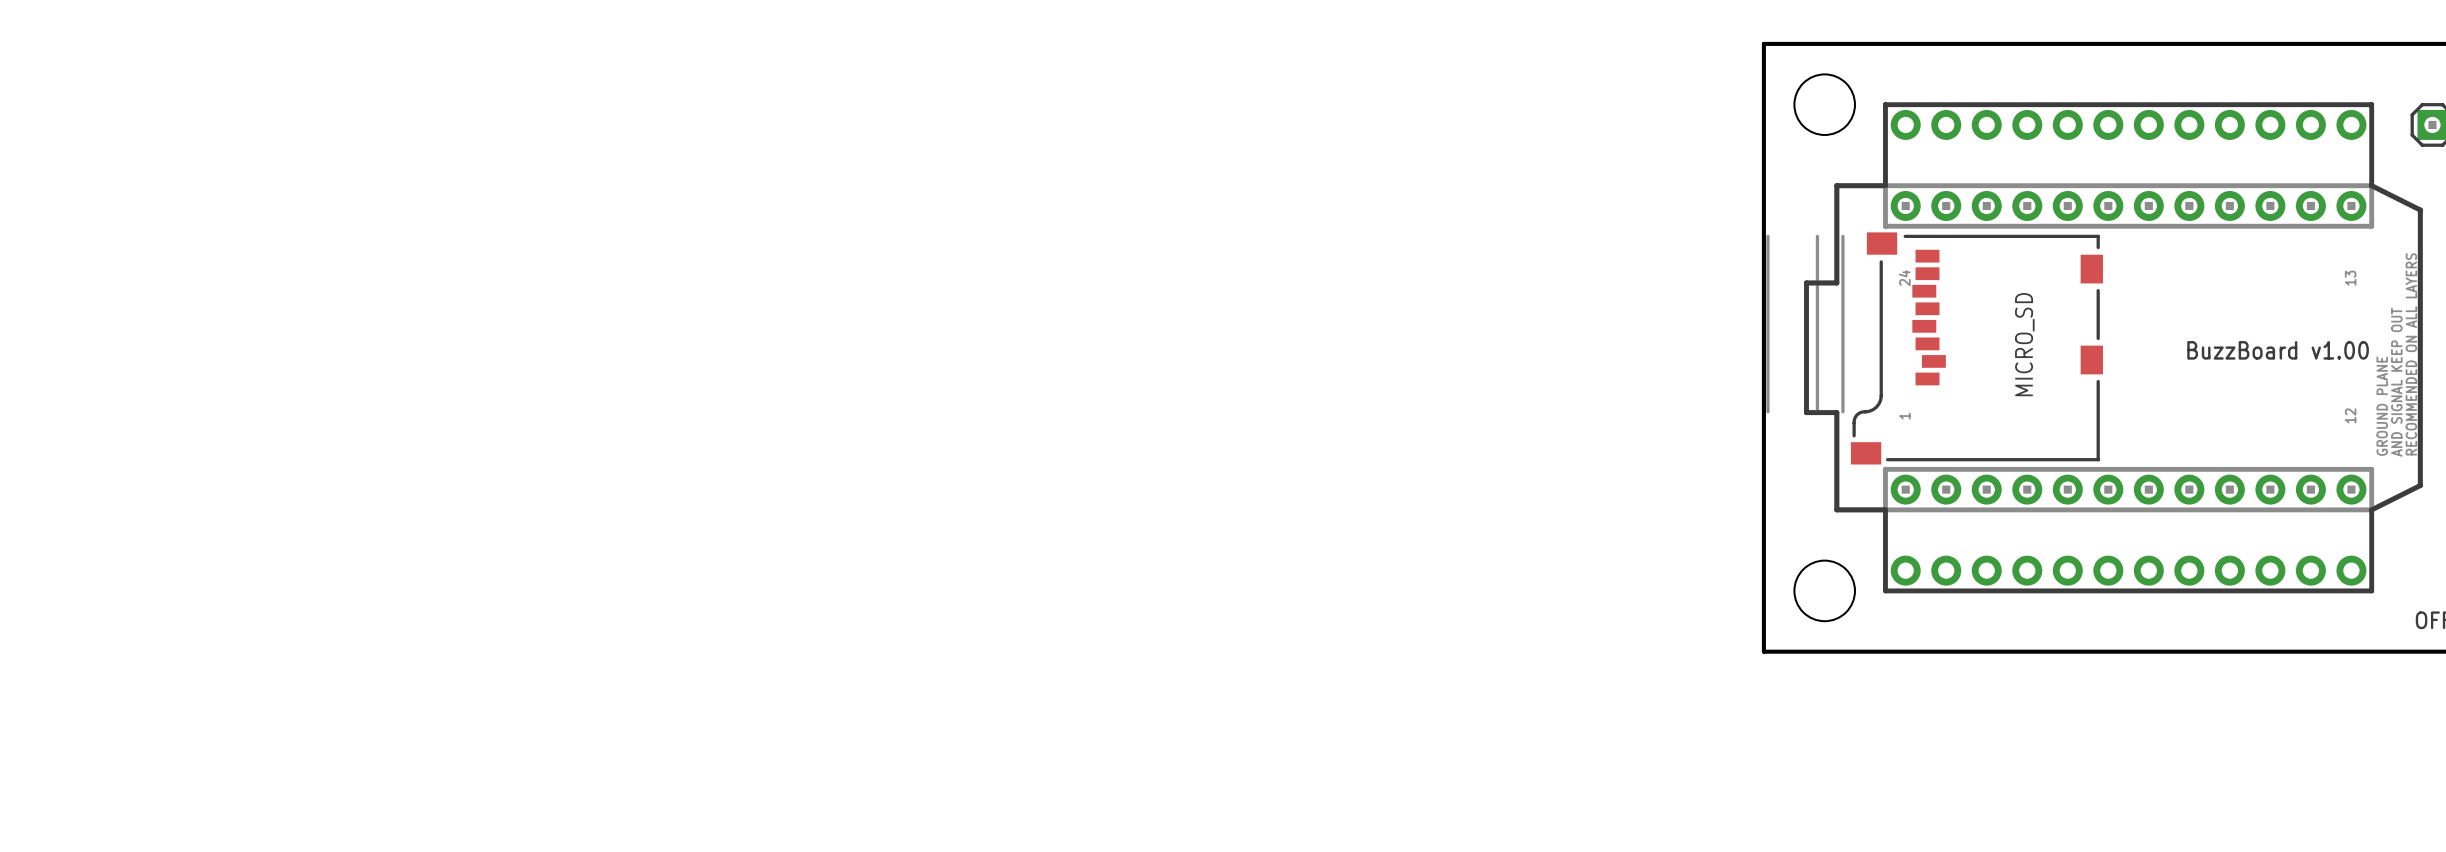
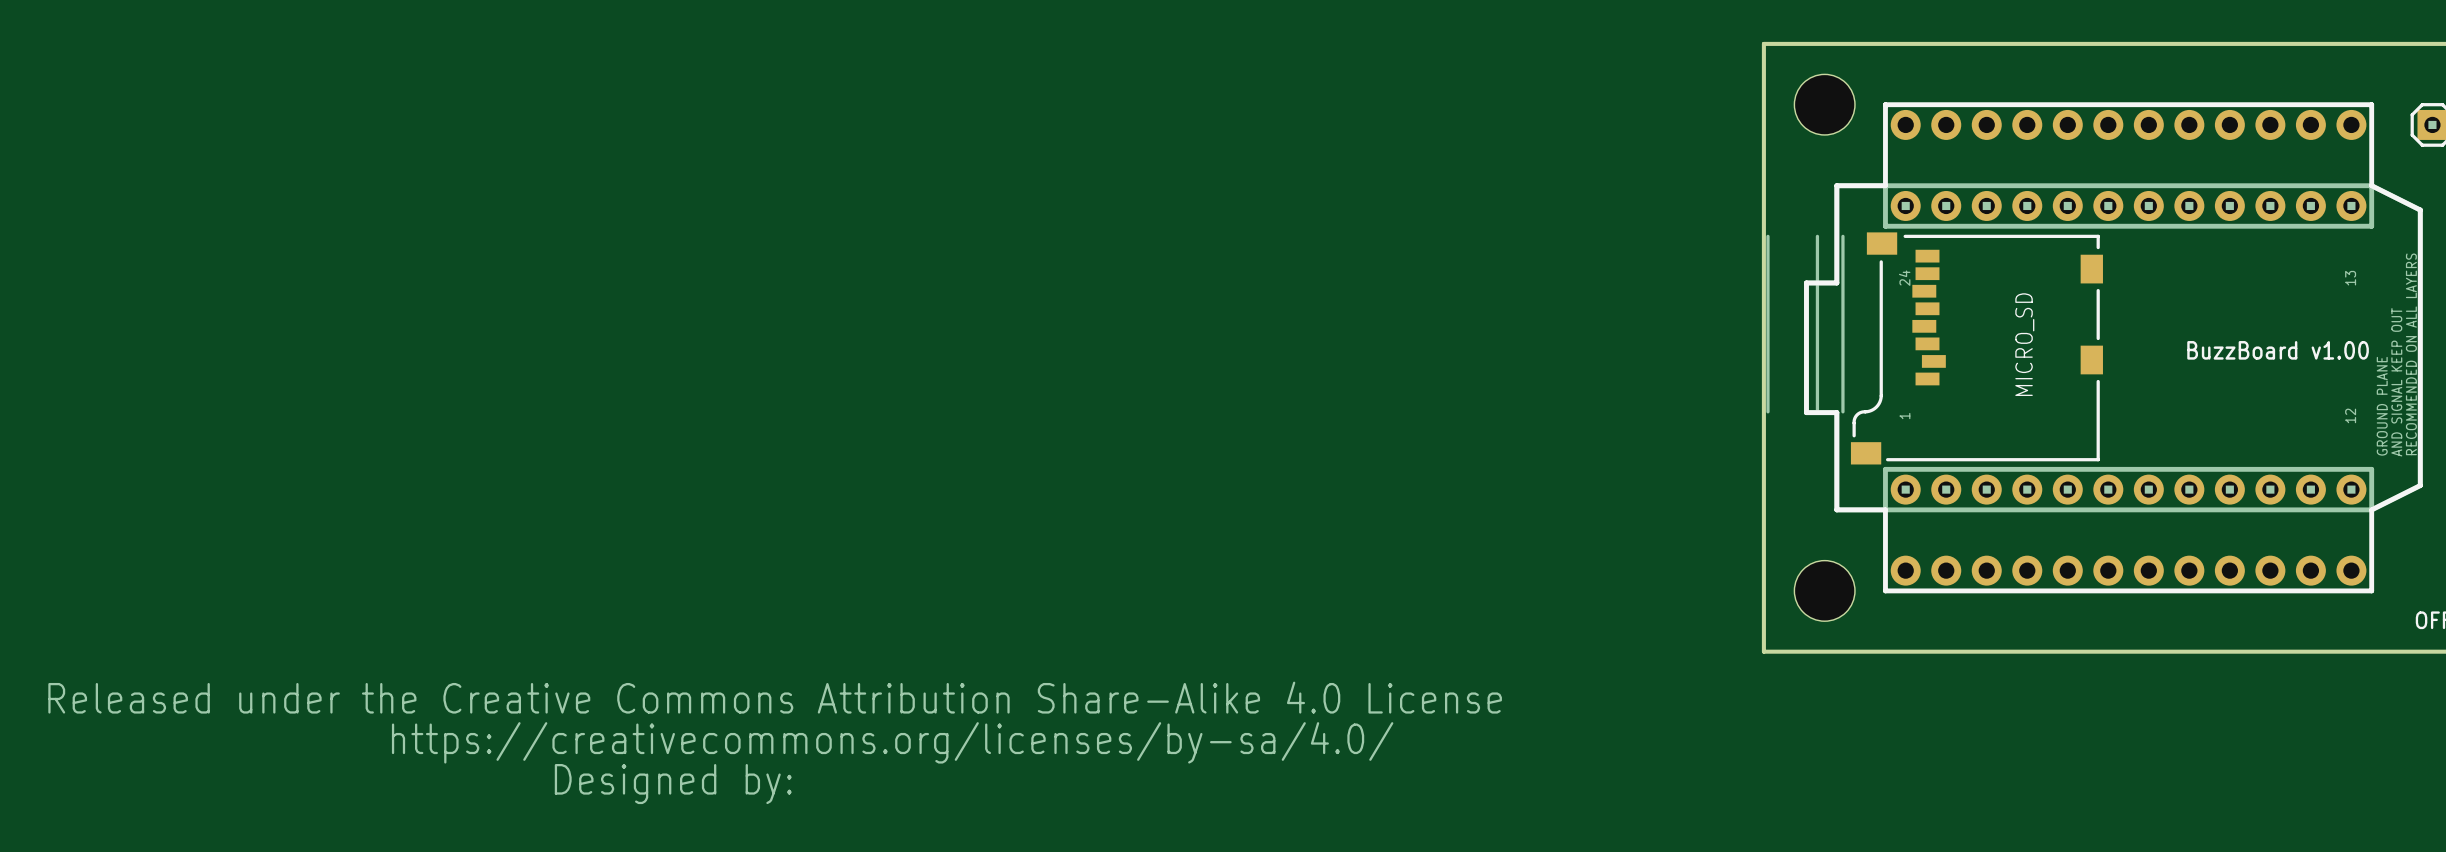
drawing: none -> [48, 681, 1502, 805]

